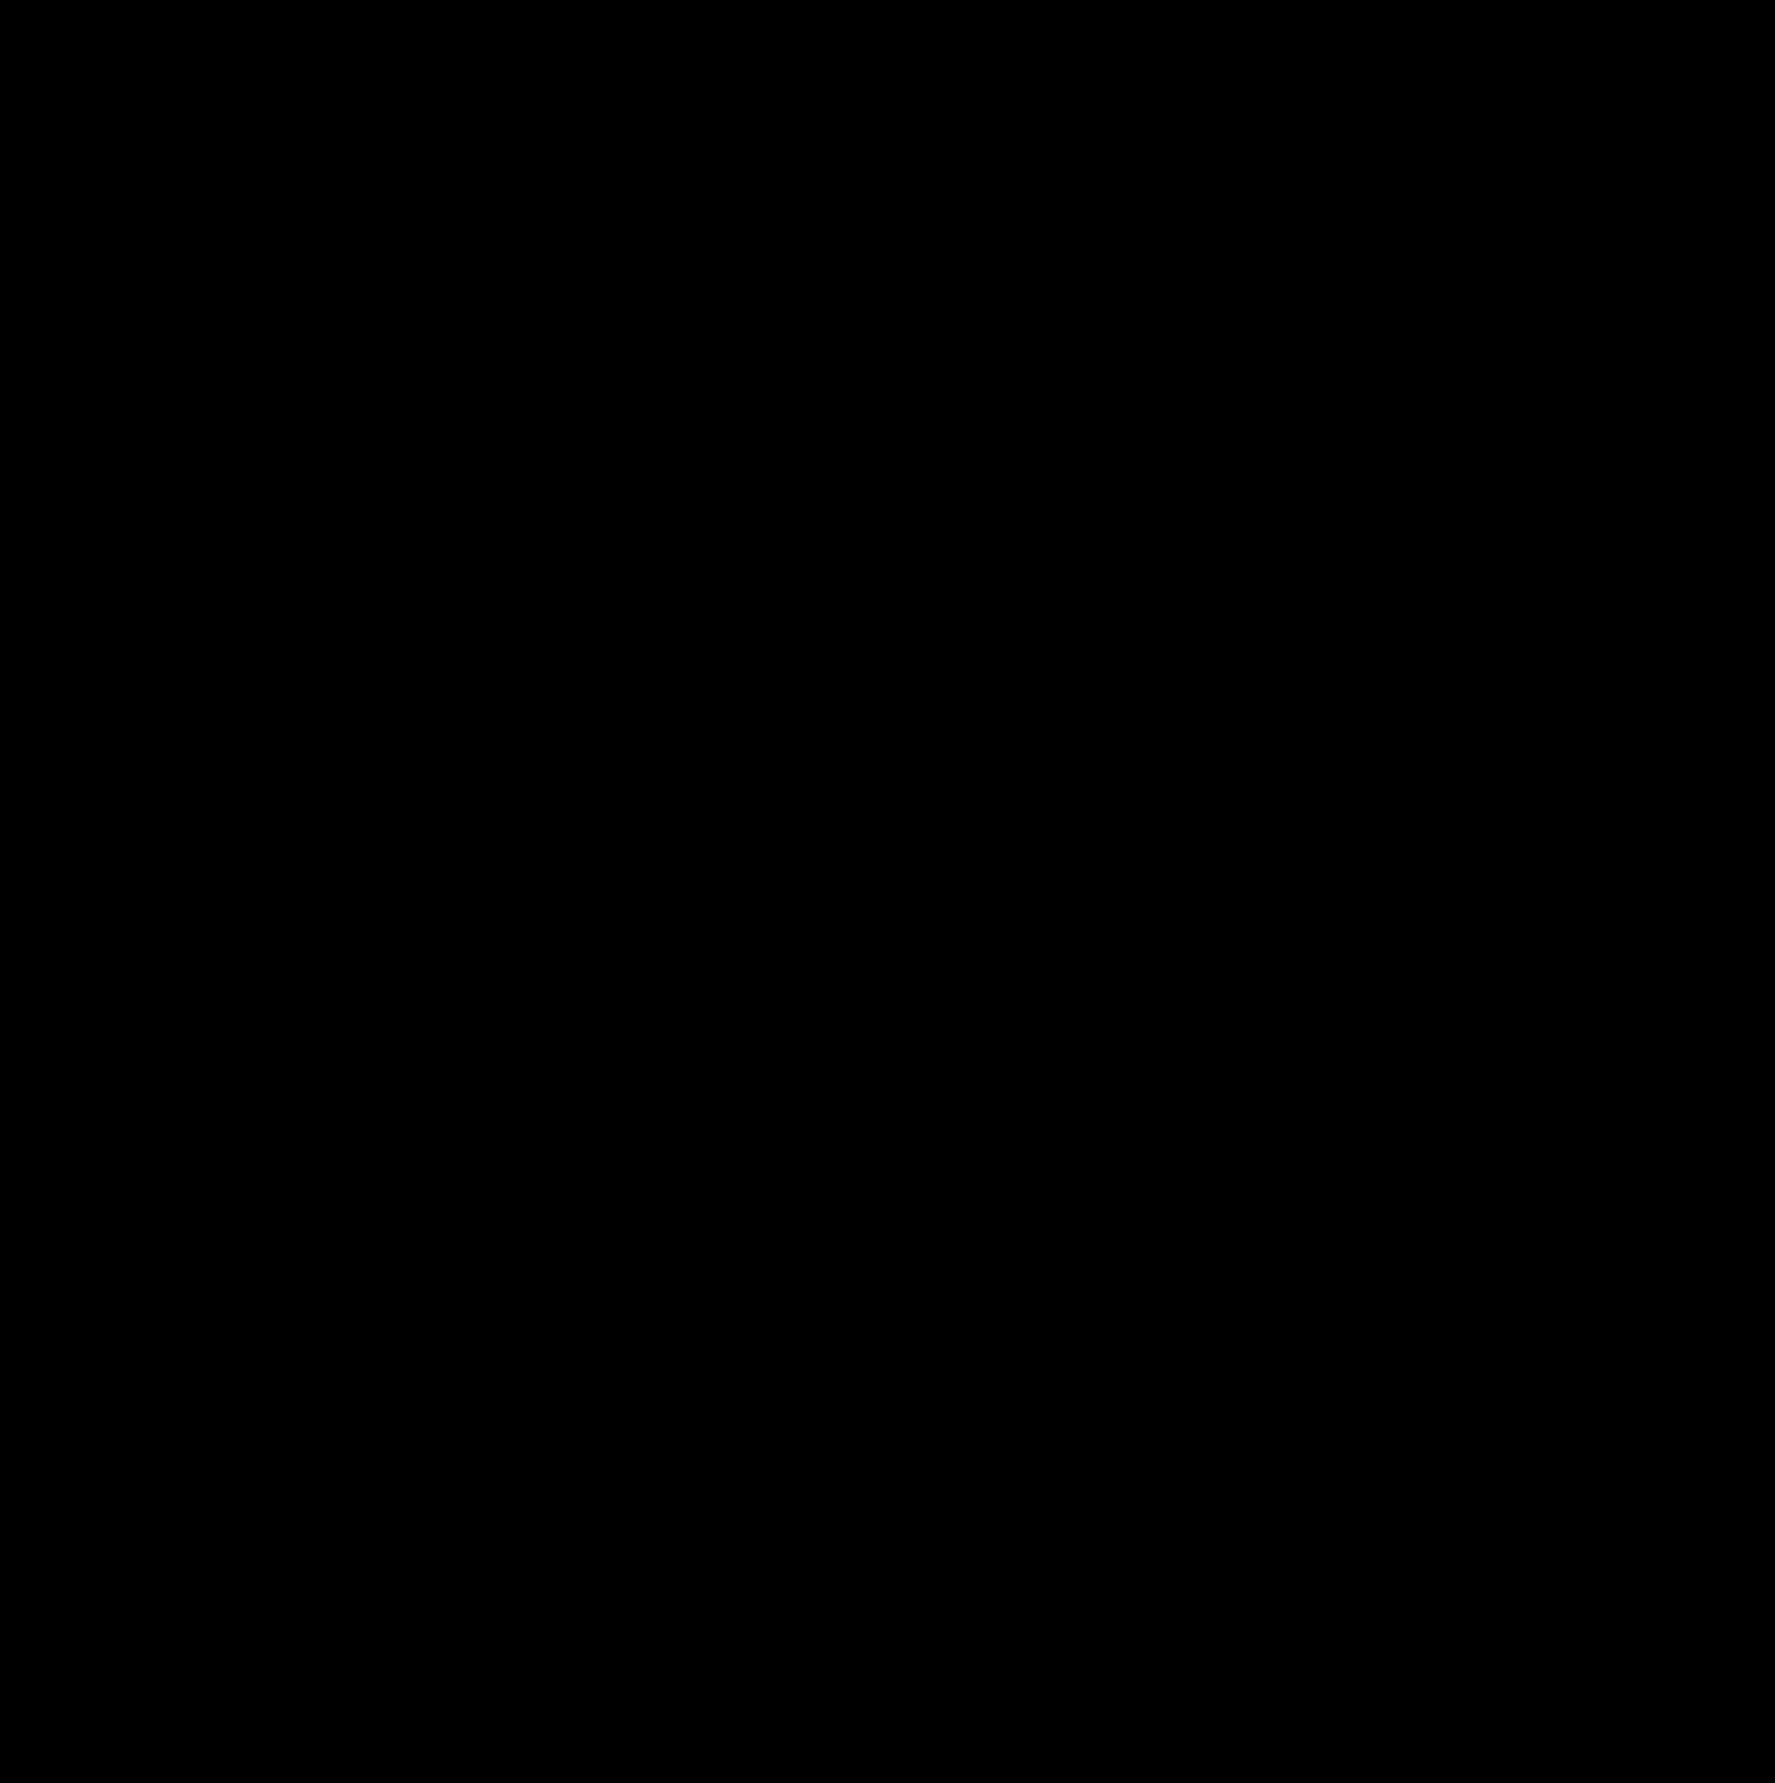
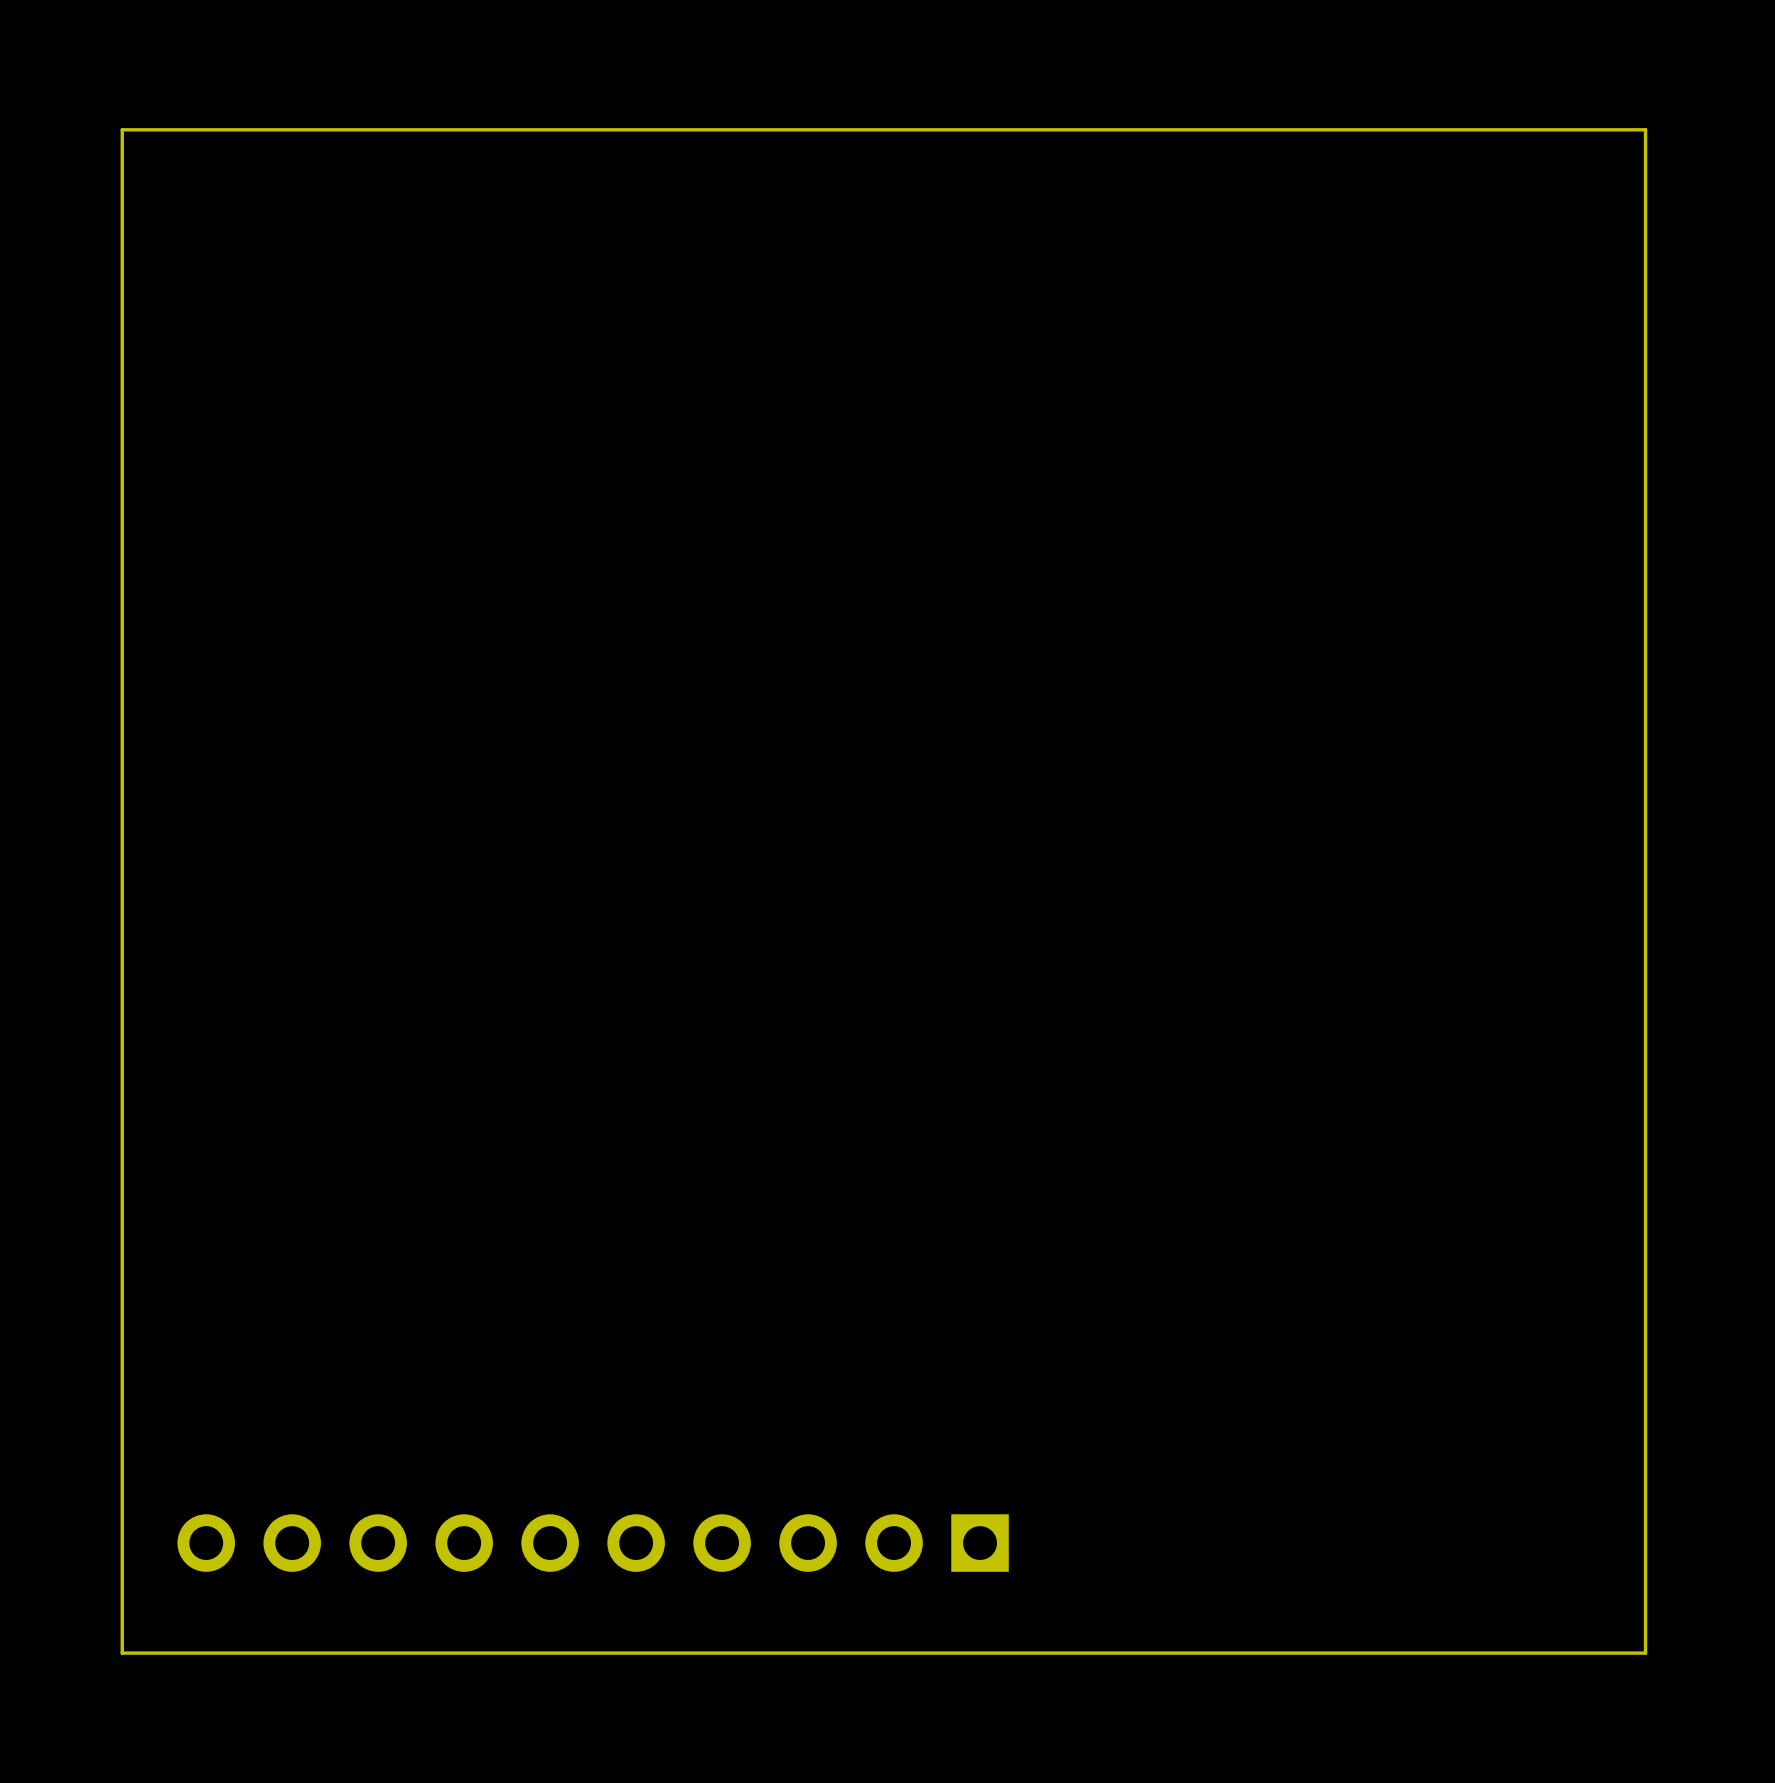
board edge: none -> (1645, 129) (122, 129) (122, 1653) (1645, 1653) (1645, 129)
part: none -> (593, 1543)

